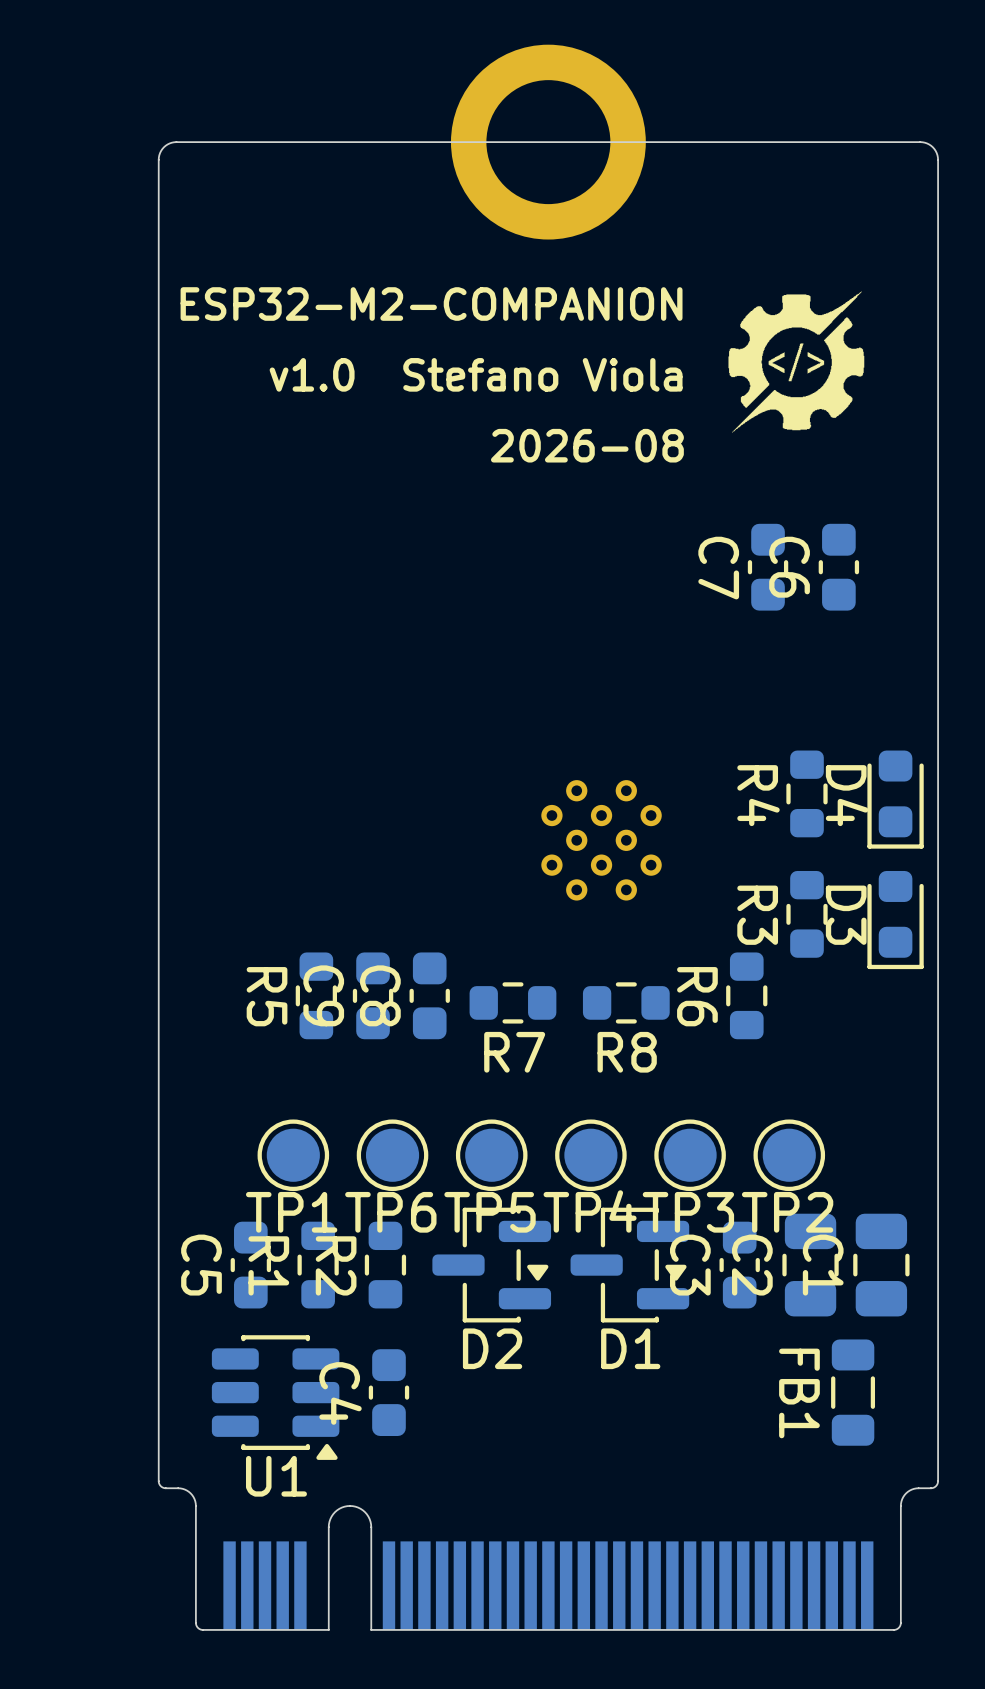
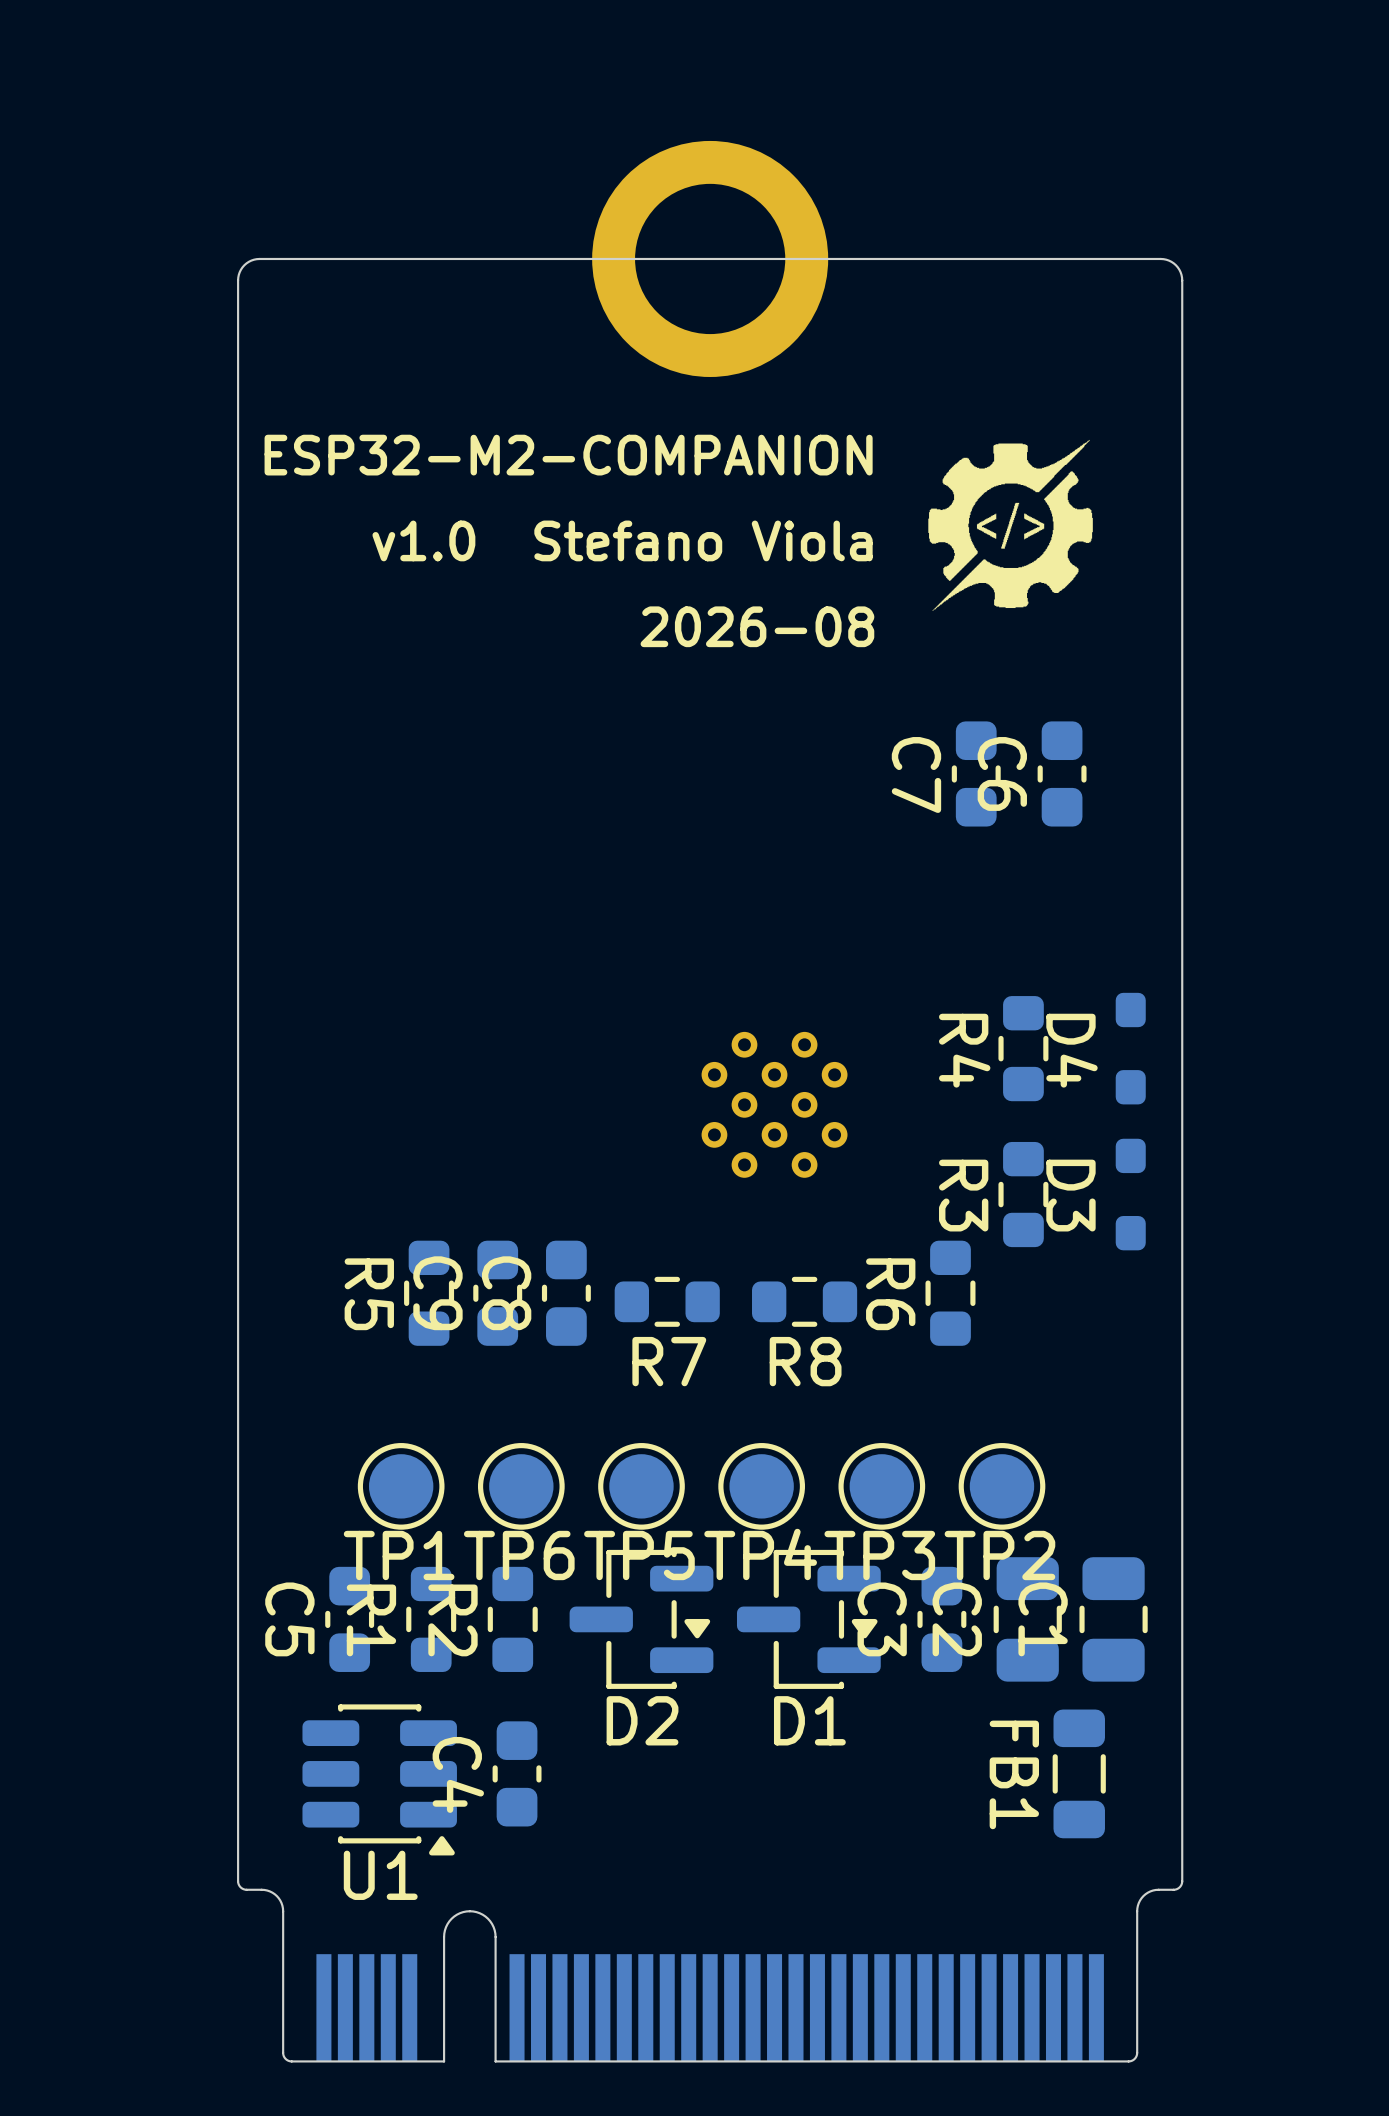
D4 footprint: [867, 750, 924, 849] -> [1115, 992, 1146, 1105]
D3 footprint: [867, 870, 924, 970] -> [1115, 1138, 1146, 1251]

